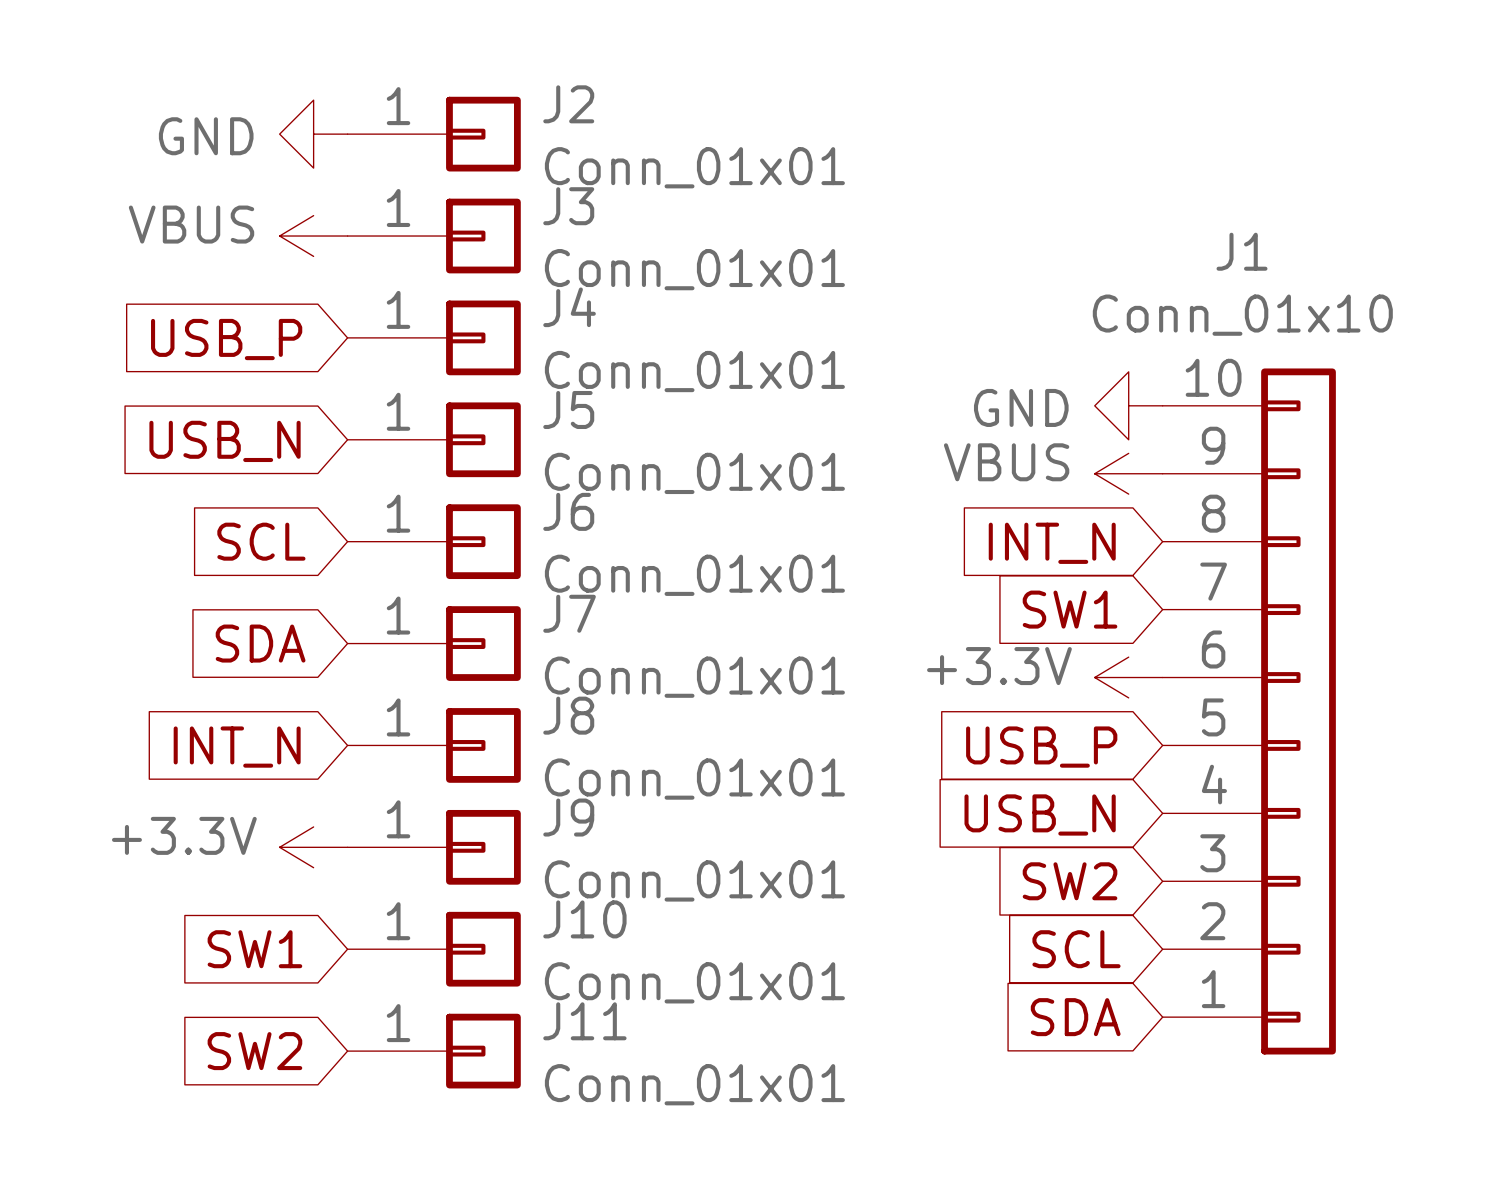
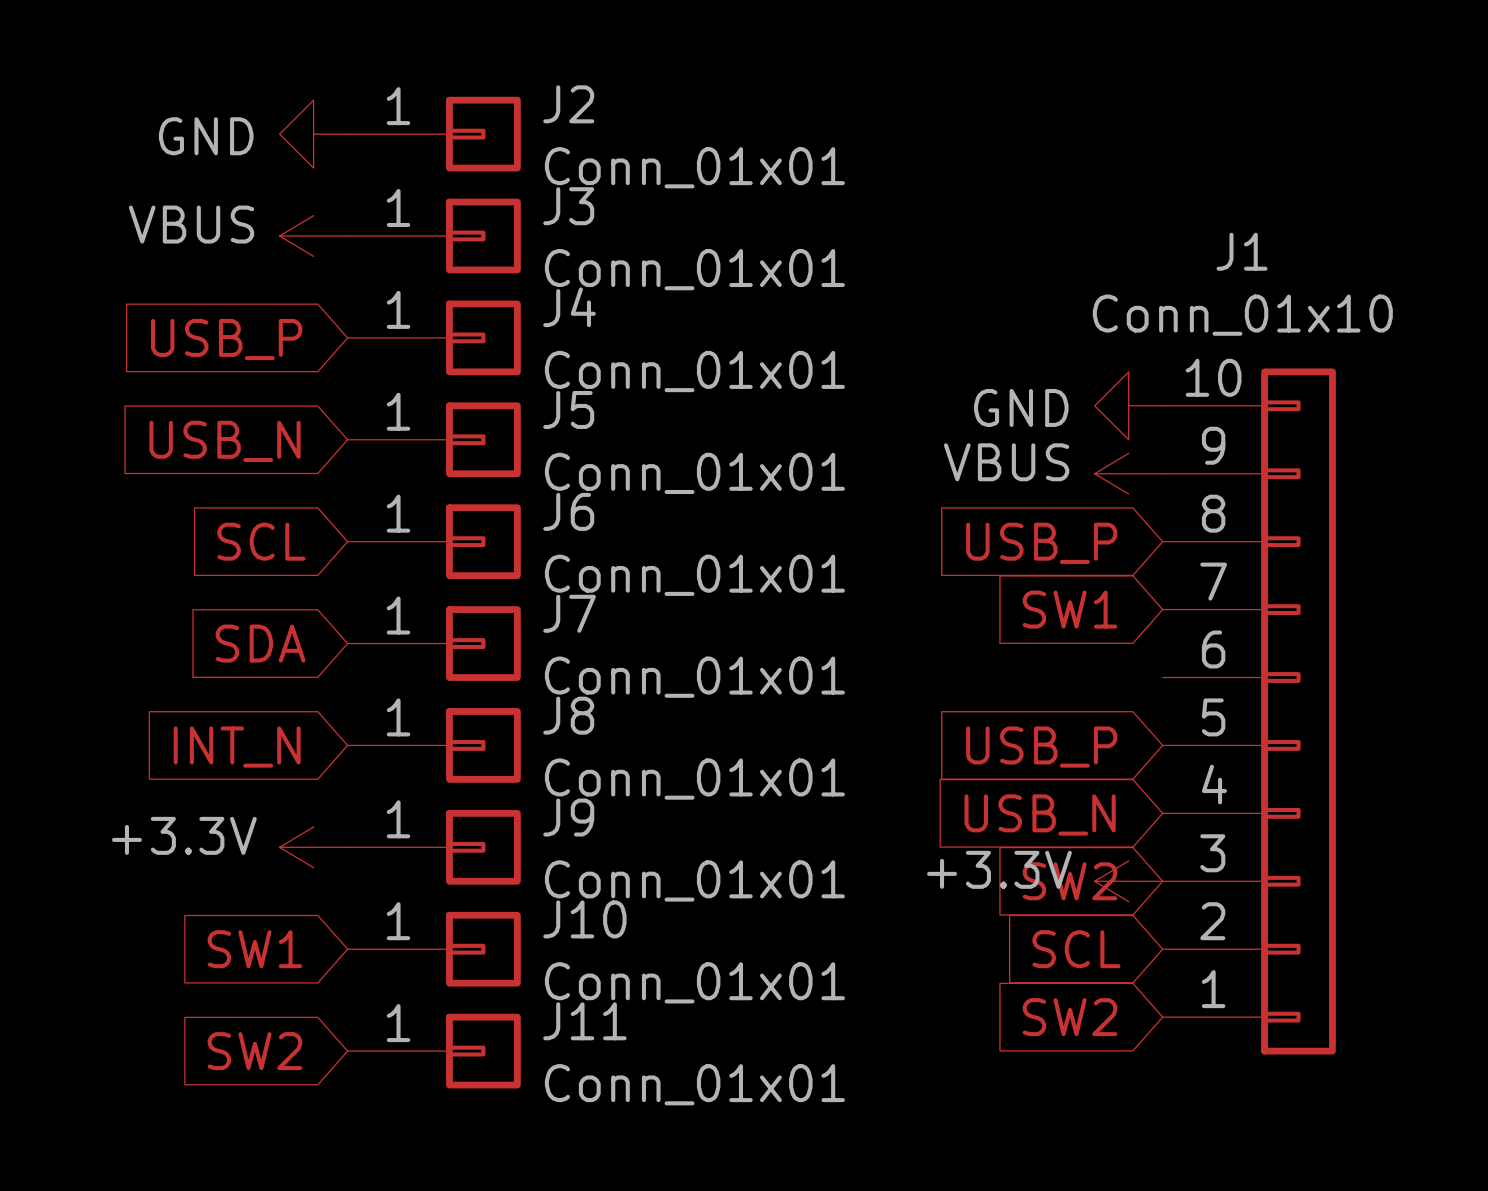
global label: INT_N (1052, 543) -> USB_P (1041, 543)
power symbol position: +3.3V (1128, 677) -> +3.3V (1128, 881)
global label: SDA (1075, 1017) -> SW2 (1070, 1017)

